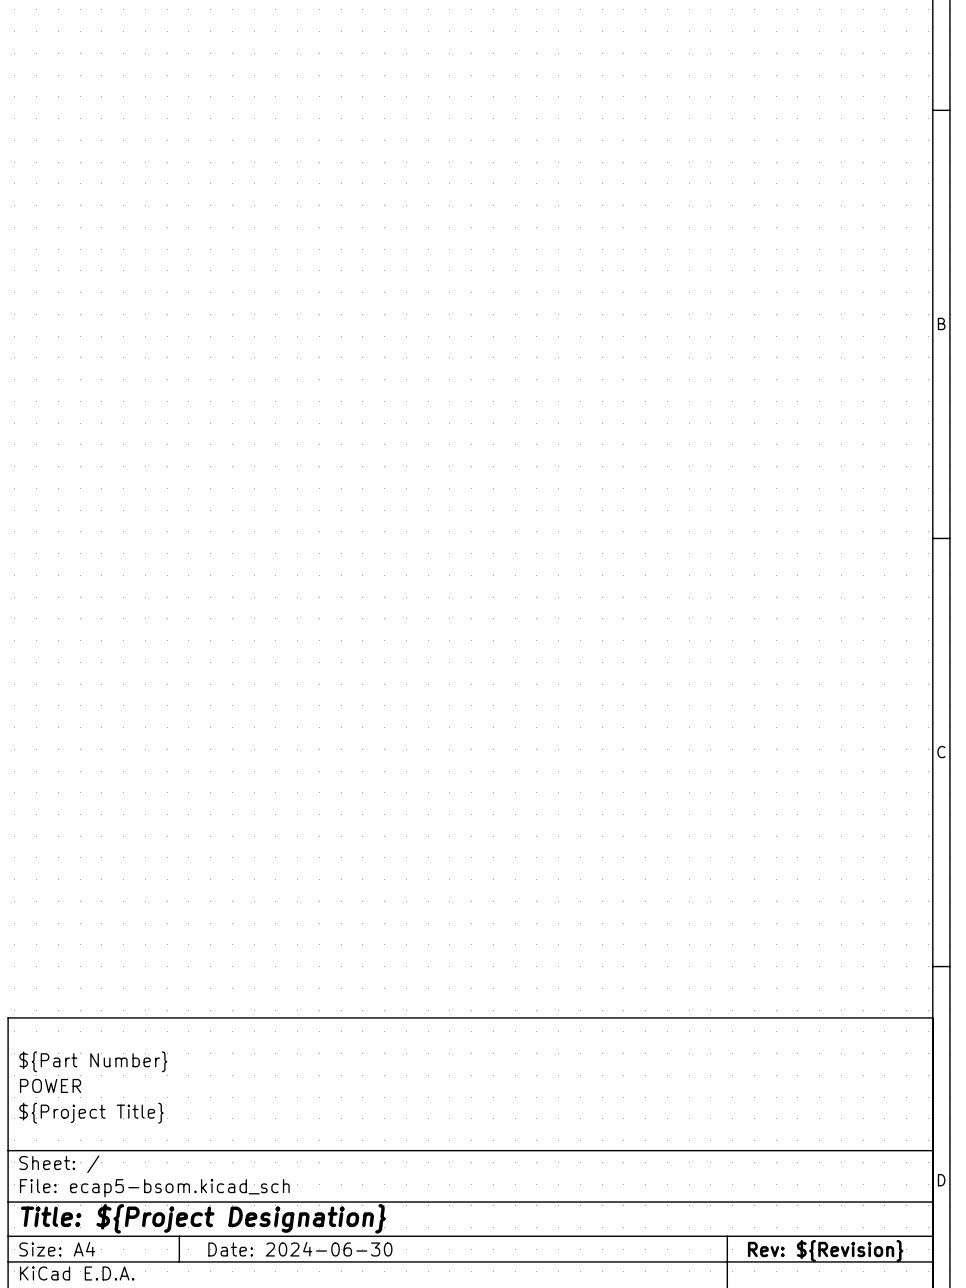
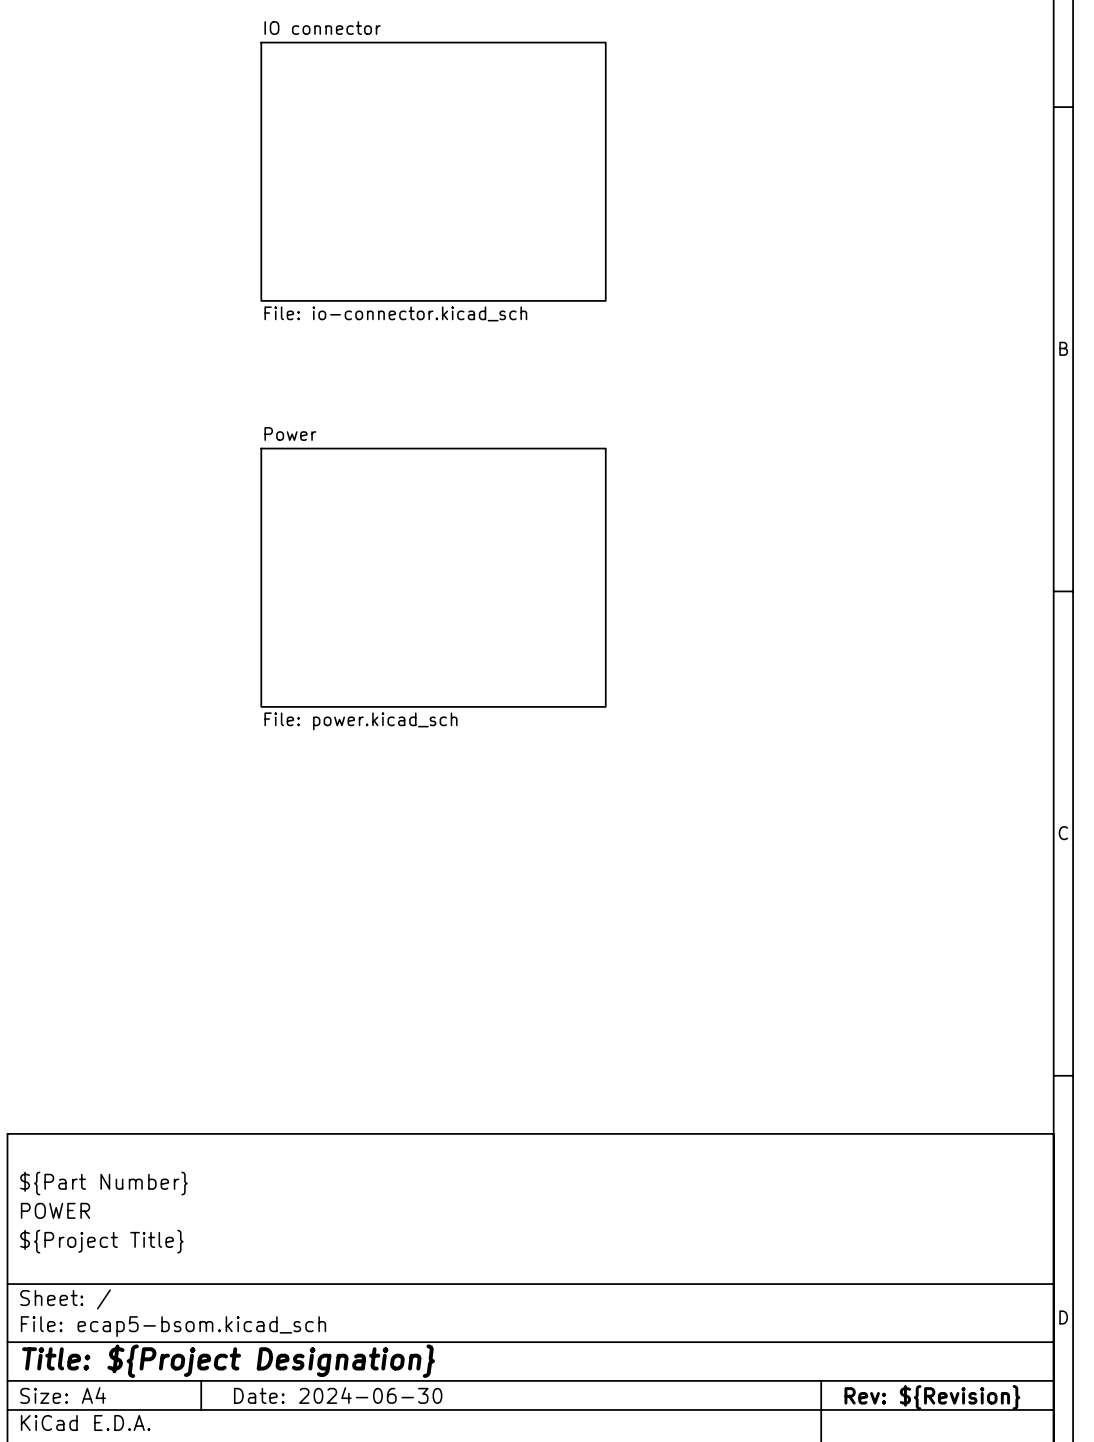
sheet IO connector: none -> File: io-connector.kicad_sch (433, 171)
sheet Power: none -> File: power.kicad_sch (433, 577)

